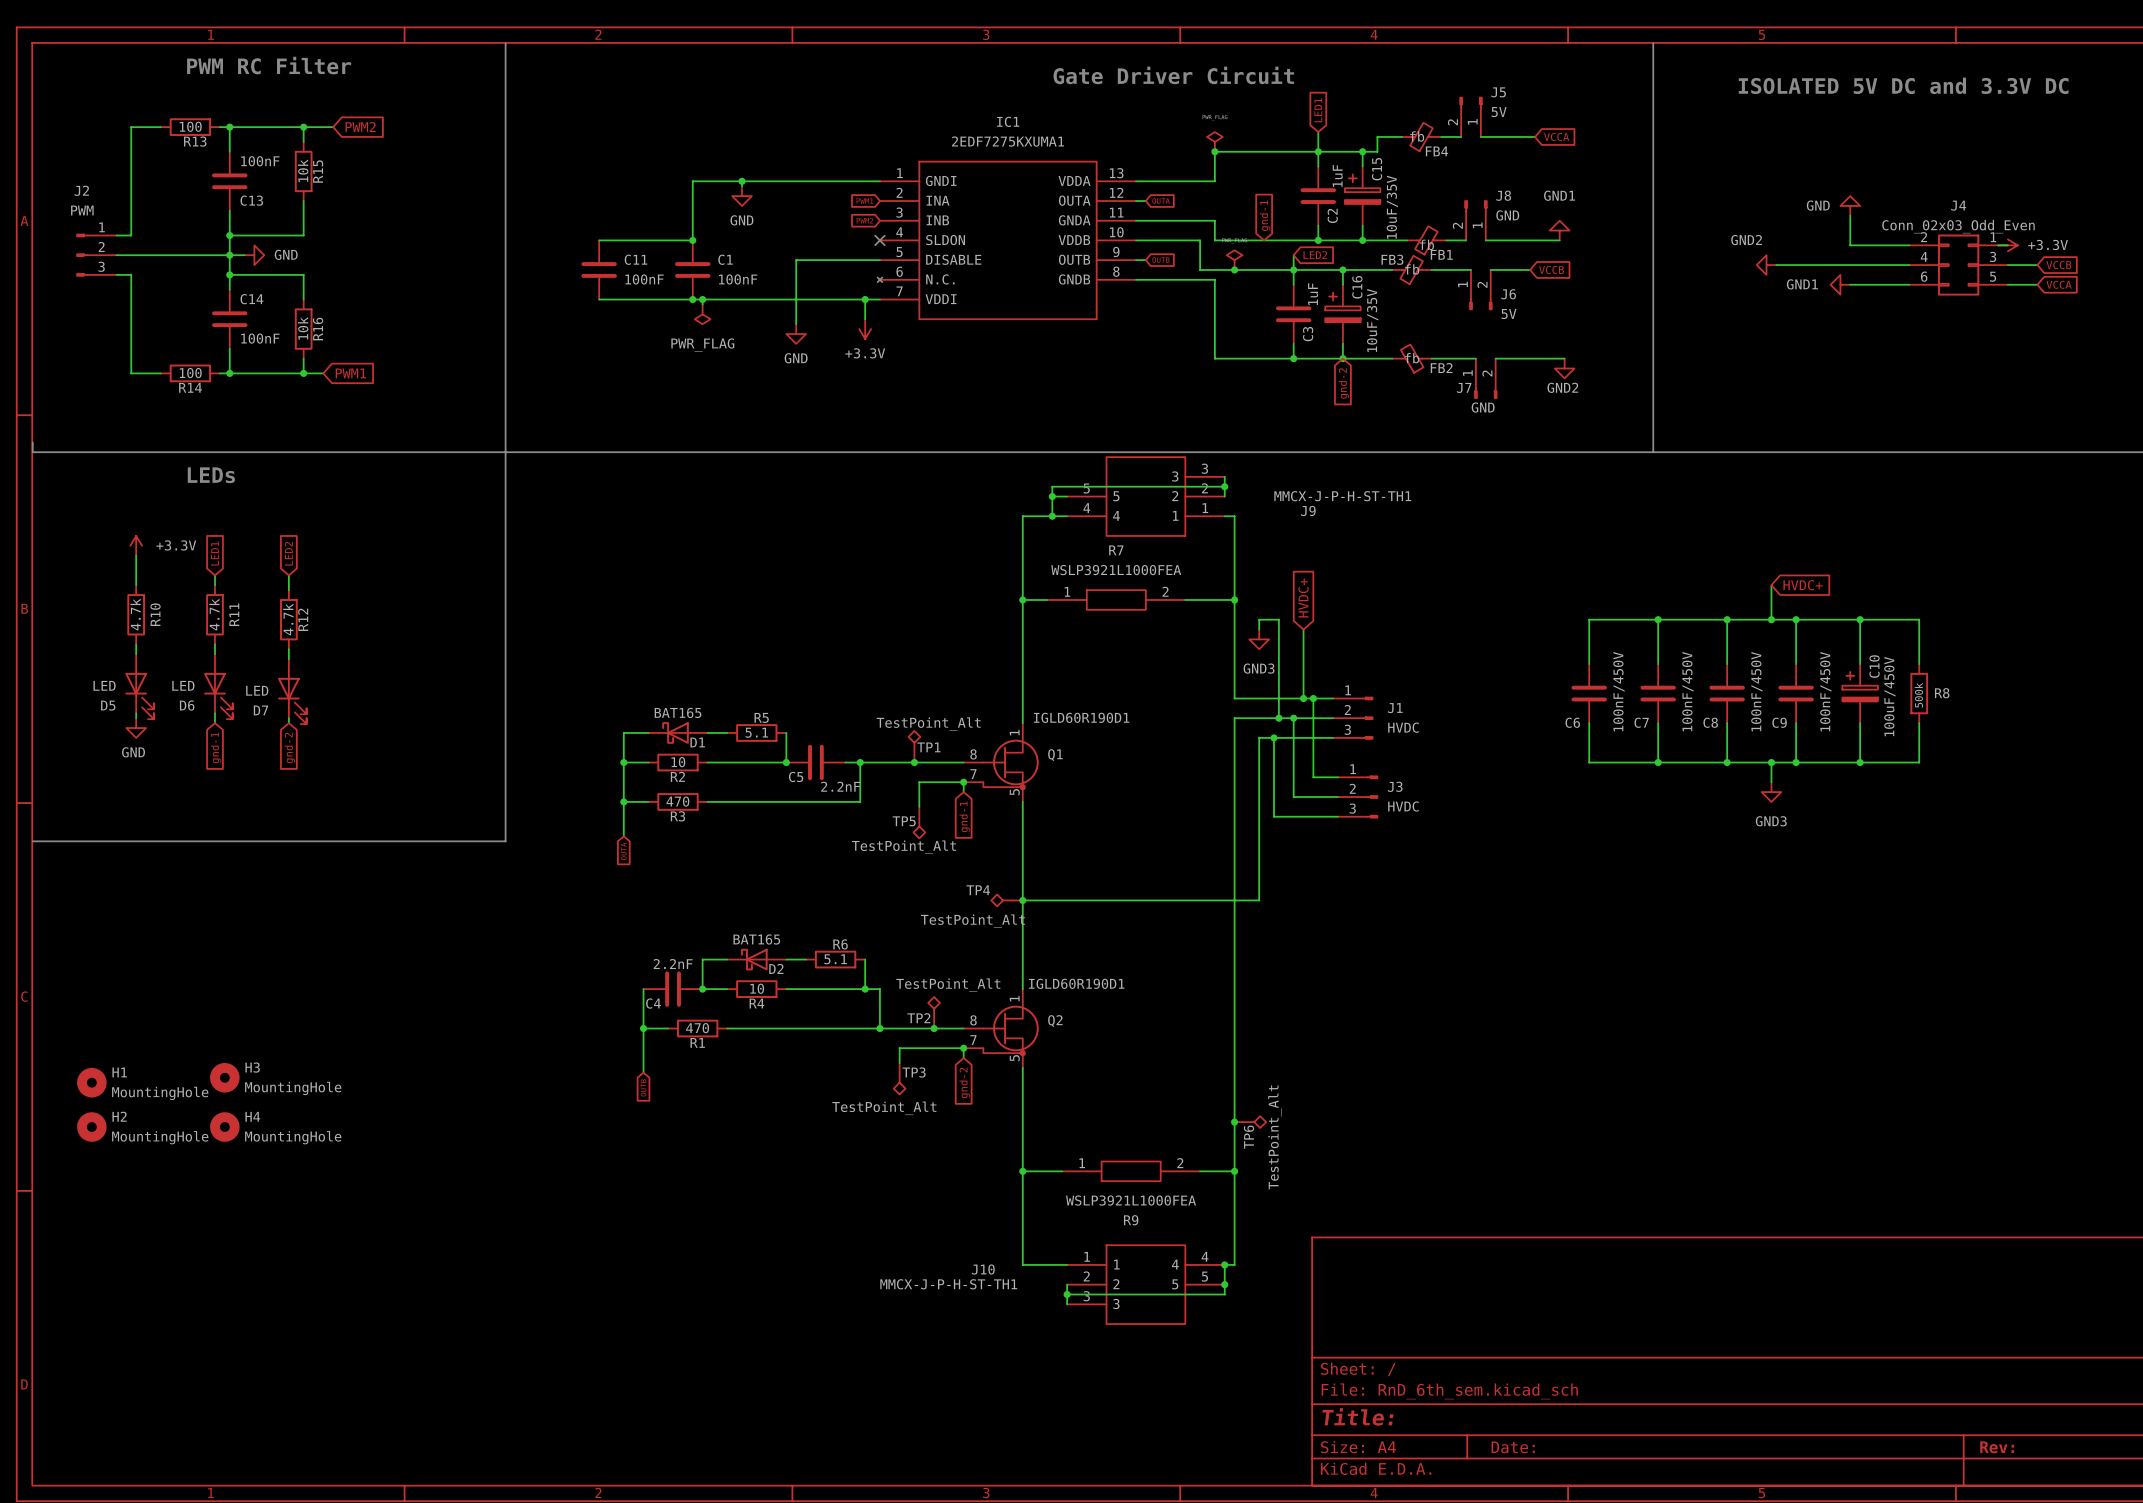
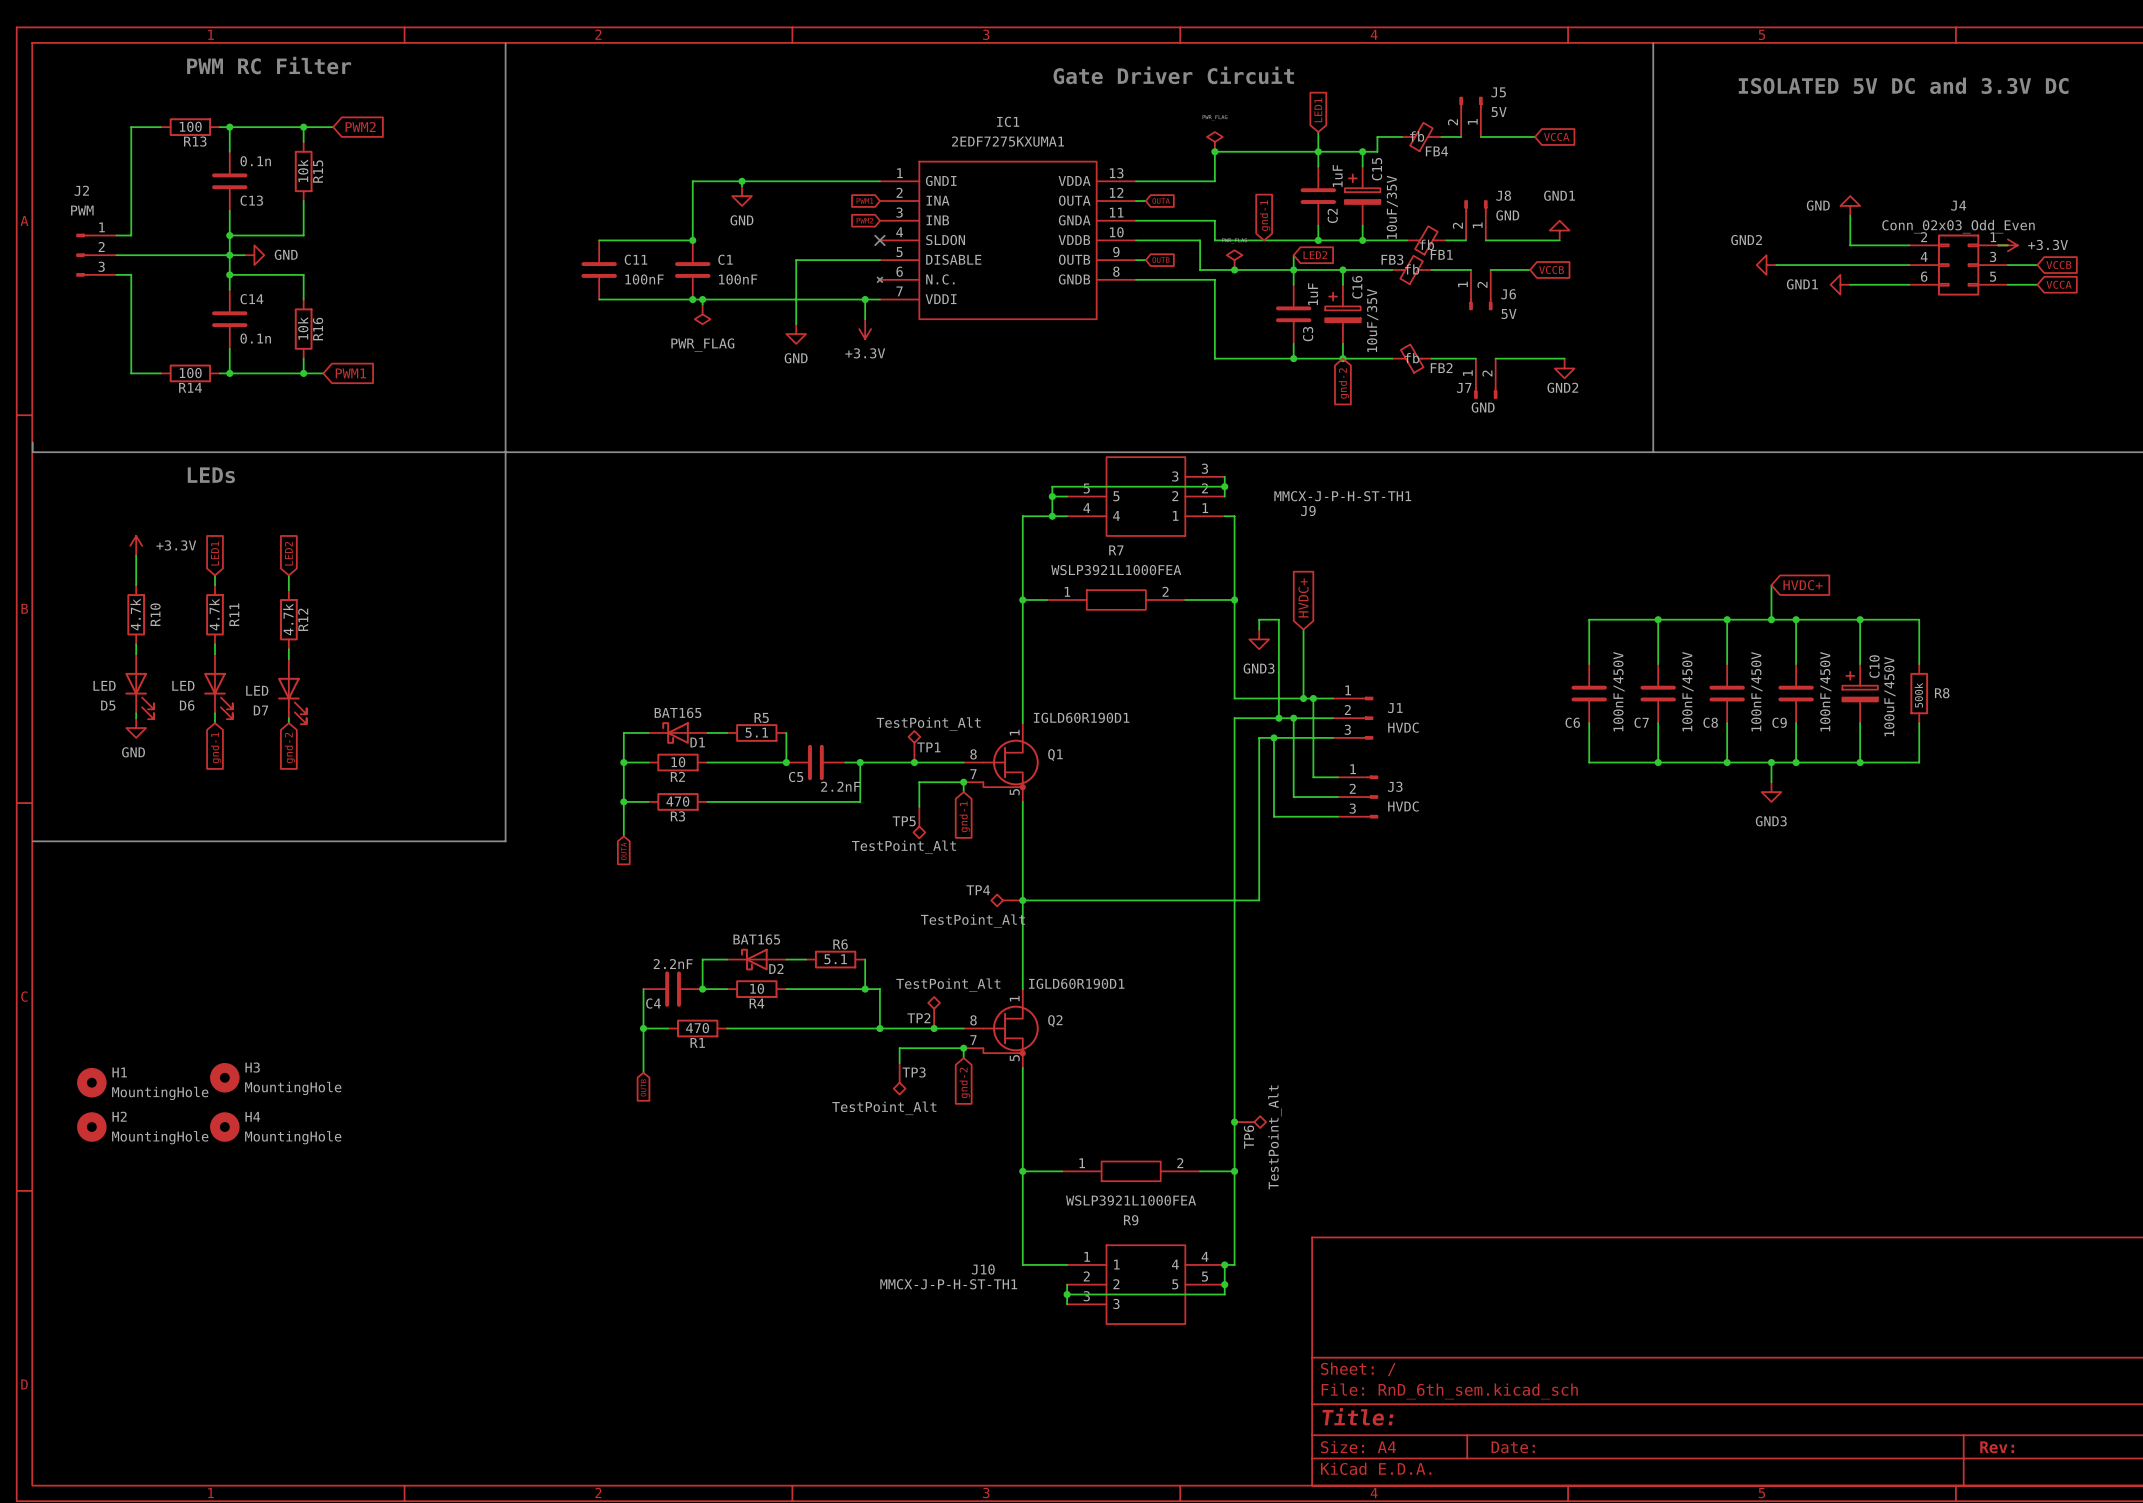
C13 value: 100nF (260, 161) -> 0.1n (255, 161)
C14 value: 100nF (260, 338) -> 0.1n (255, 338)

